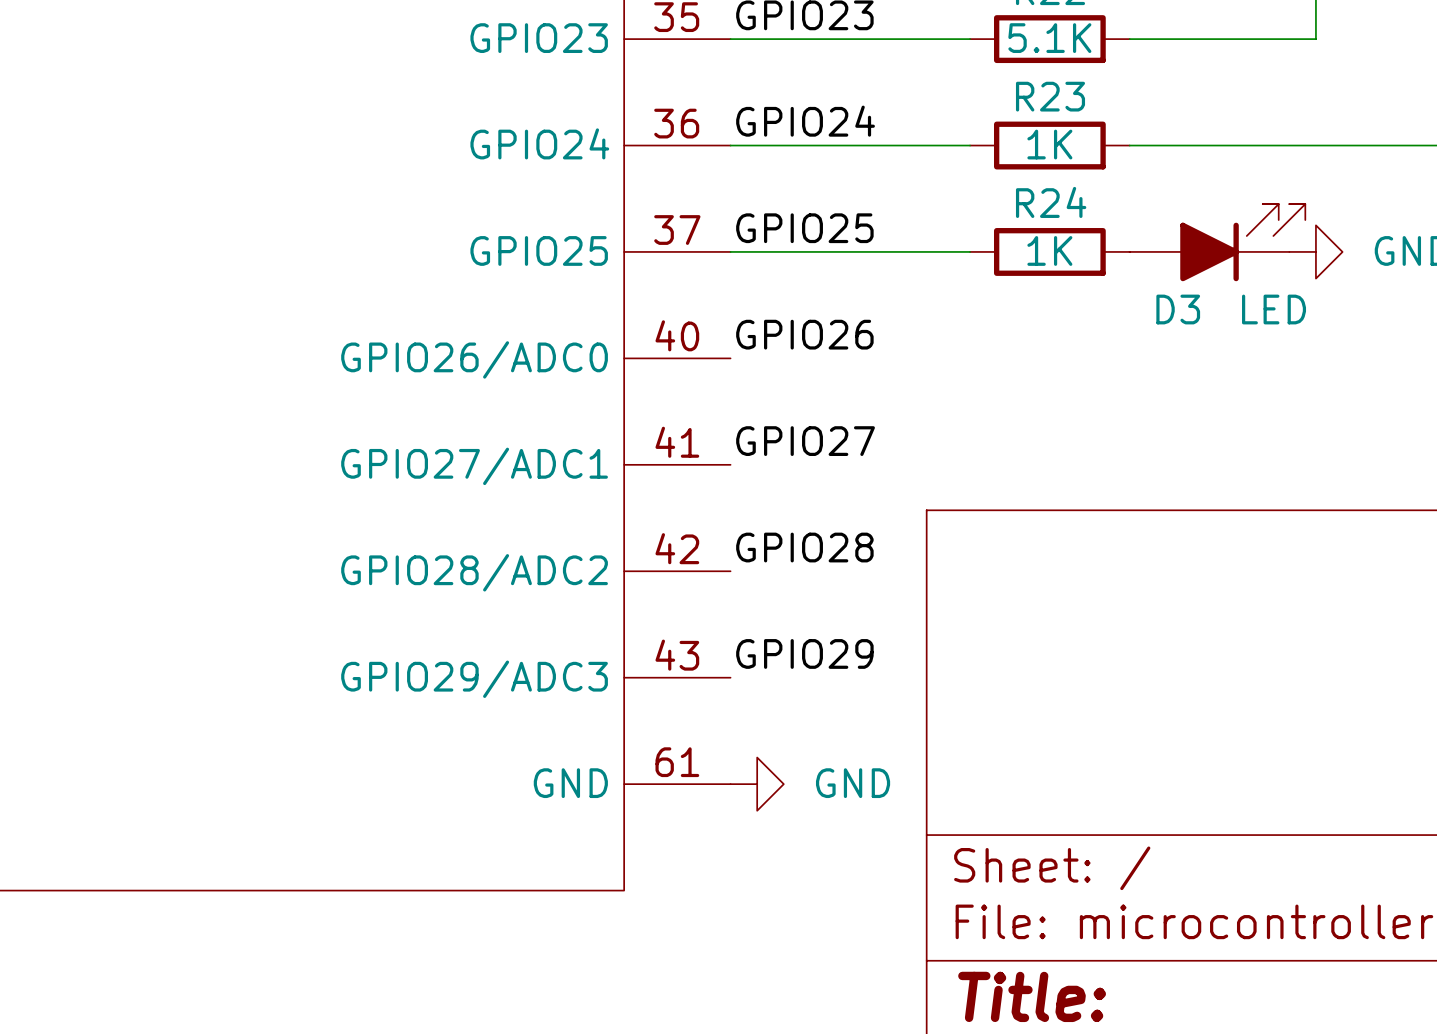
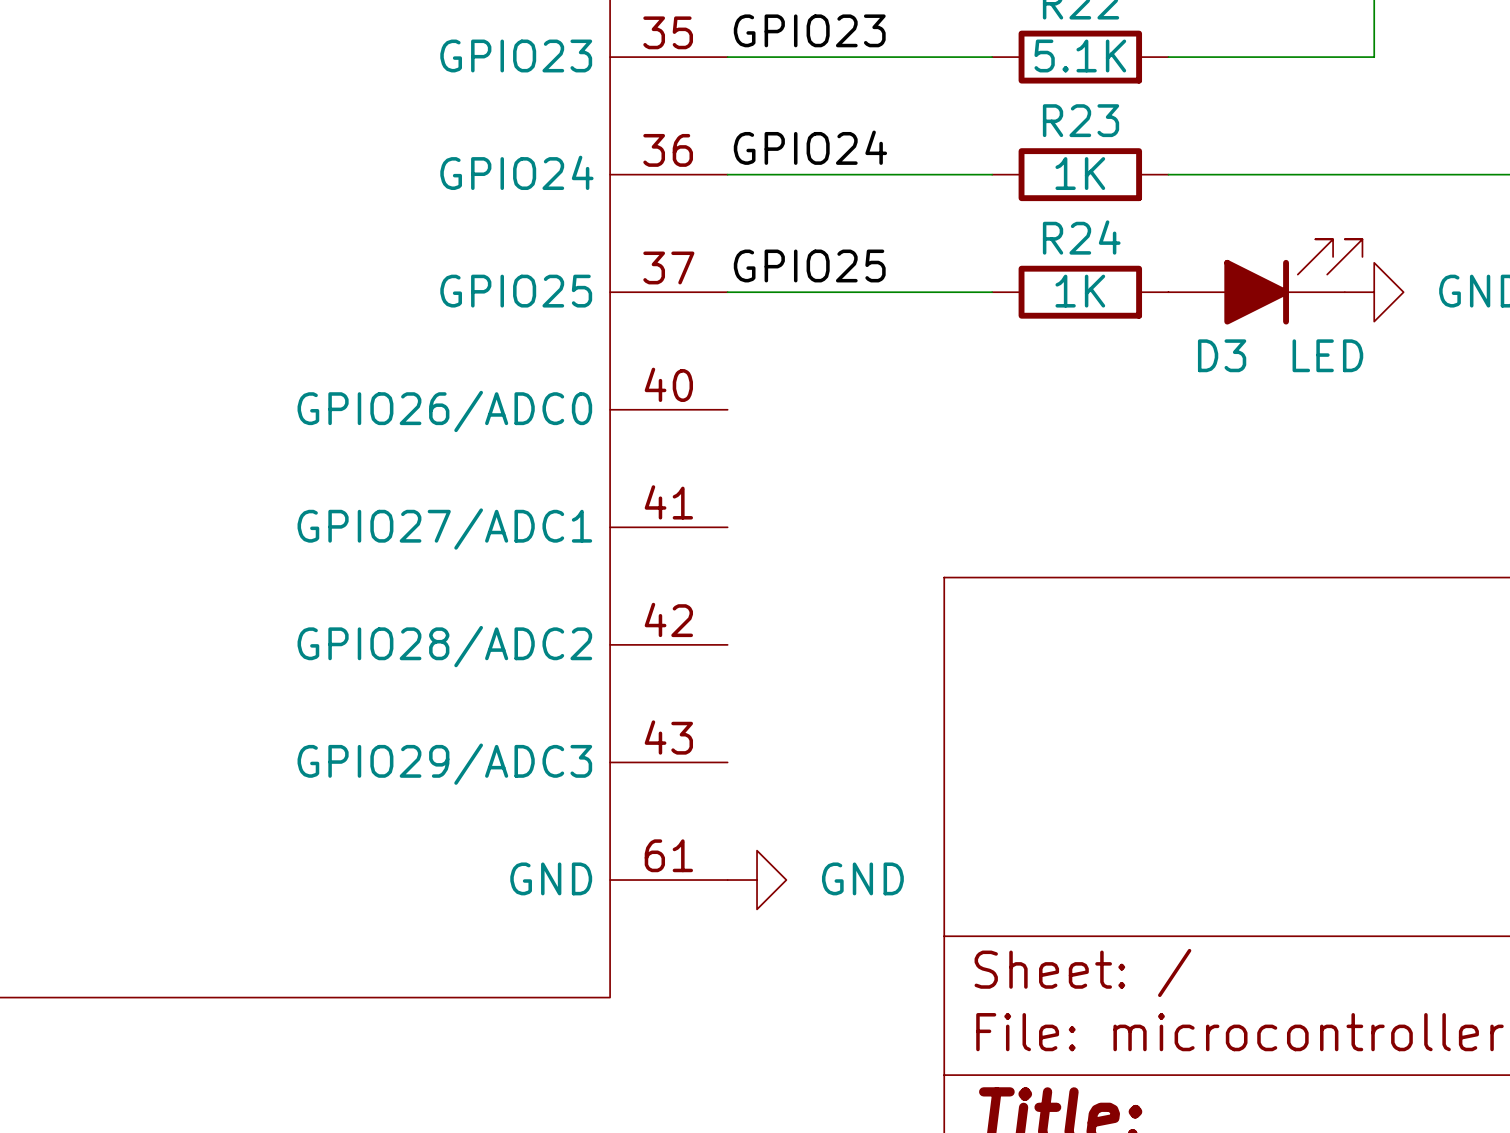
label: GPIO26 (804, 334) -> none
label: GPIO27 (805, 441) -> none
label: GPIO28 (804, 547) -> none
label: GPIO29 (804, 653) -> none

